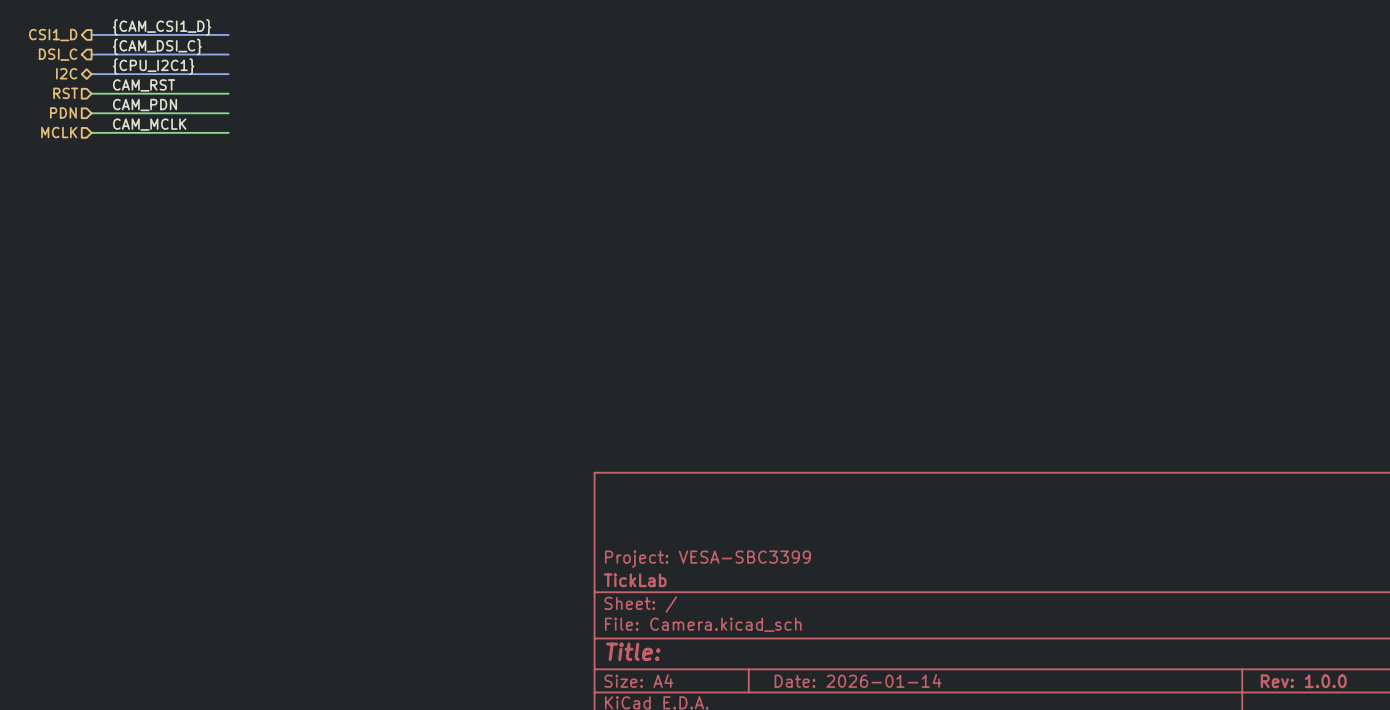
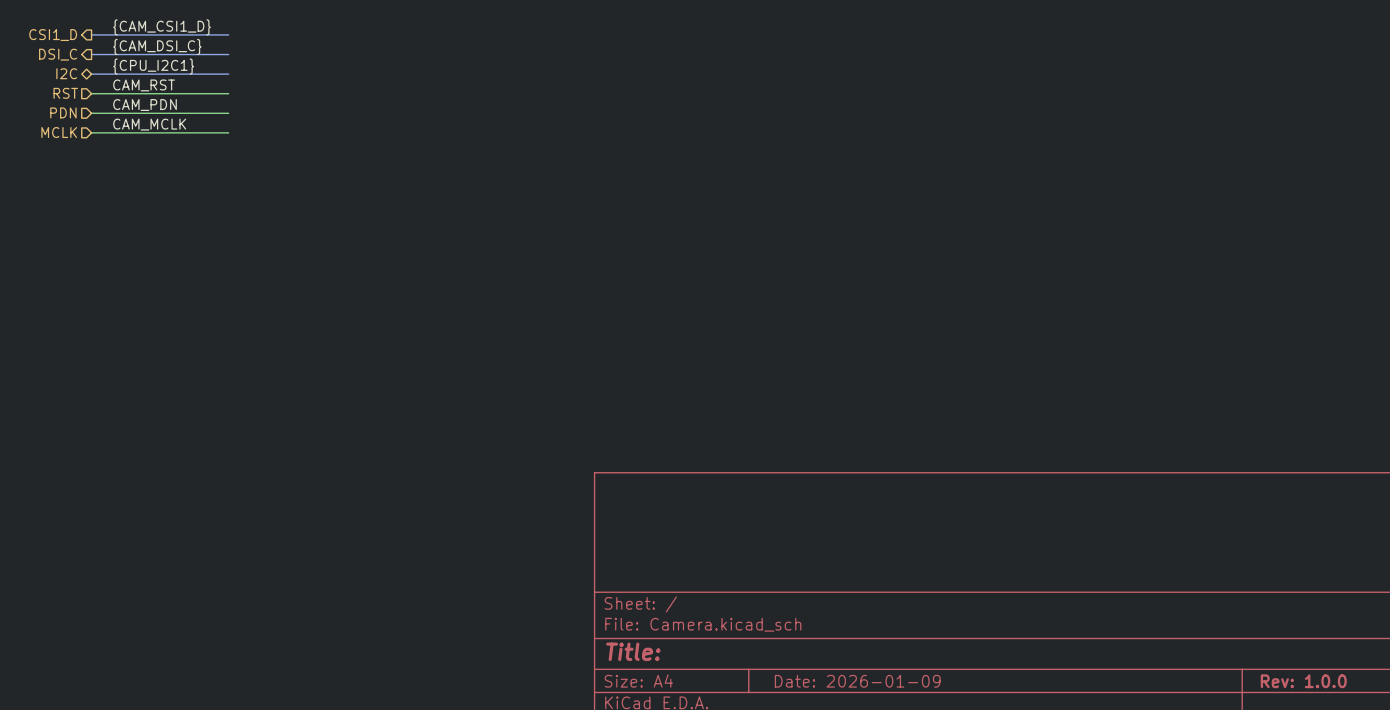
title block: Project: VESA-SBC3399 (707, 559) -> none
title block: TickLab (635, 580) -> none
title block: Date: 2026-01-14 (858, 680) -> Date: 2026-01-09 (857, 681)

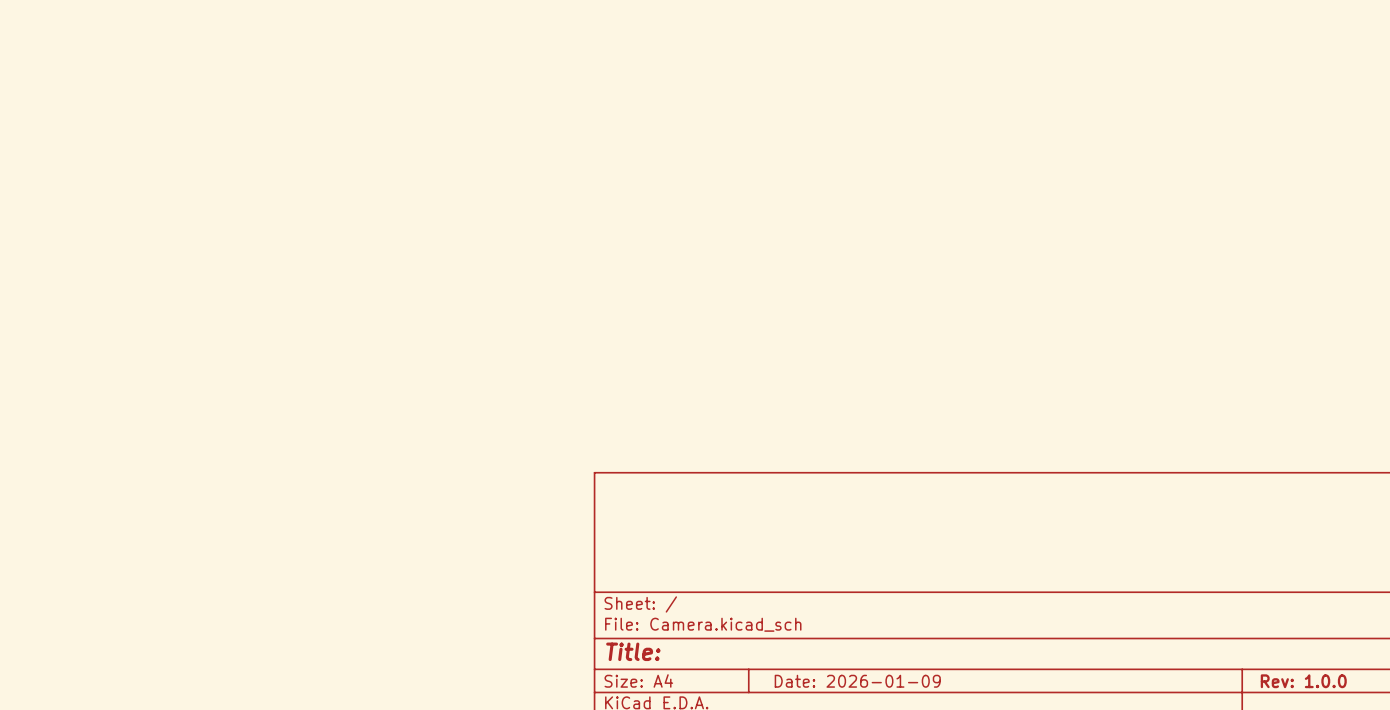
label: {CAM_CSI1_D} (162, 27) -> none
bus: (91, 34) (228, 34) -> none
hierarchical label: CSI1_D (53, 35) -> none
label: {CAM_DSI_C} (157, 46) -> none
hierarchical label: DSI_C (58, 54) -> none
bus: (91, 54) (228, 54) -> none
label: {CPU_I2C1} (153, 66) -> none
hierarchical label: I2C (66, 73) -> none
bus: (91, 74) (228, 74) -> none
label: CAM_RST (144, 85) -> none
hierarchical label: RST (65, 93) -> none
wire: (91, 93) (228, 93) -> none
label: CAM_PDN (145, 105) -> none
hierarchical label: PDN (63, 112) -> none
wire: (91, 113) (228, 113) -> none
label: CAM_MCLK (149, 124) -> none
hierarchical label: MCLK (59, 132) -> none
wire: (91, 132) (228, 132) -> none

